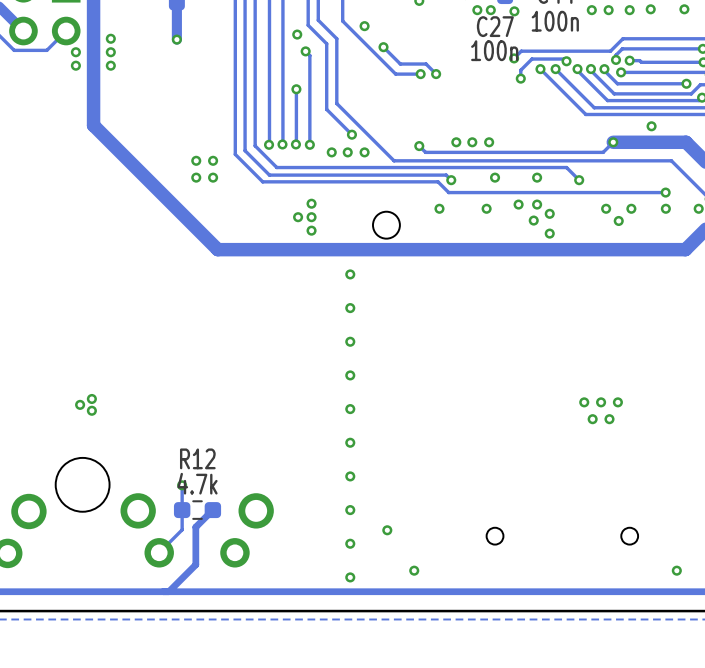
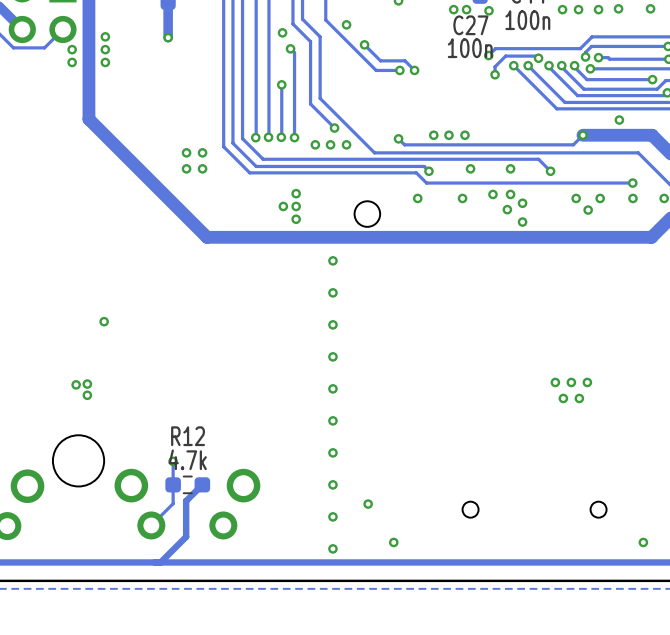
via: none -> (104, 321)
via: (91, 398) -> none
via: none -> (87, 384)
via: (91, 410) -> none
via: none -> (87, 395)

